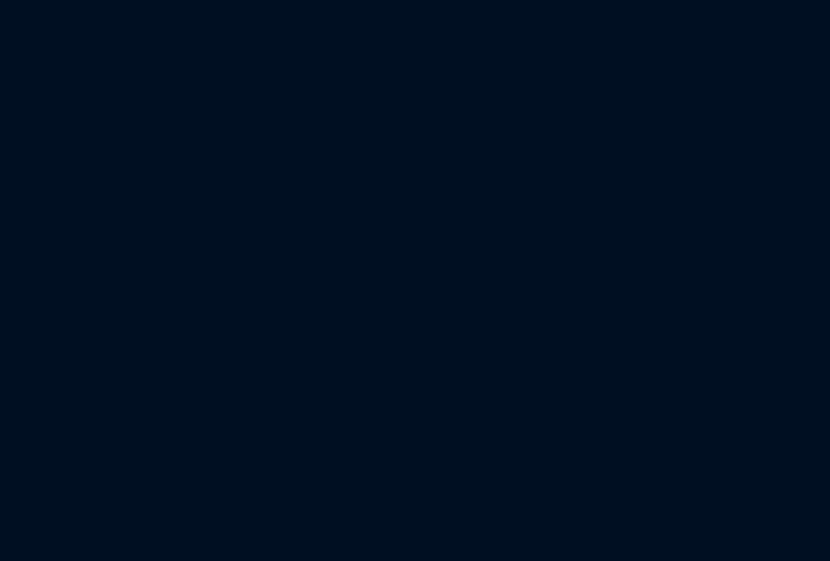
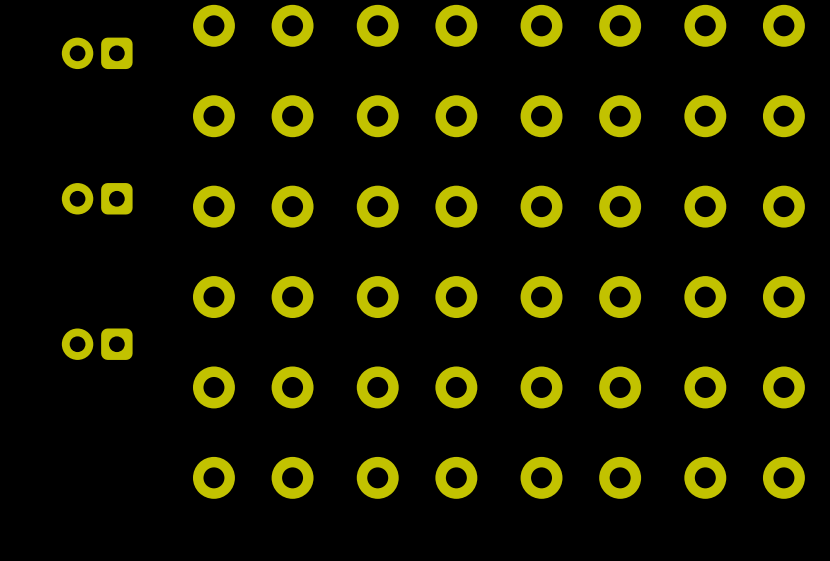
part: none -> (253, 25)
part: none -> (417, 25)
part: none -> (580, 25)
part: none -> (744, 25)
part: none -> (97, 53)
part: none -> (253, 116)
part: none -> (417, 116)
part: none -> (580, 116)
part: none -> (744, 116)
part: none -> (97, 198)
part: none -> (253, 206)
part: none -> (417, 206)
part: none -> (580, 206)
part: none -> (744, 206)
part: none -> (253, 297)
part: none -> (417, 297)
part: none -> (580, 297)
part: none -> (744, 297)
part: none -> (97, 344)
part: none -> (253, 387)
part: none -> (417, 387)
part: none -> (580, 387)
part: none -> (744, 387)
part: none -> (253, 477)
part: none -> (417, 477)
part: none -> (580, 477)
part: none -> (744, 477)

